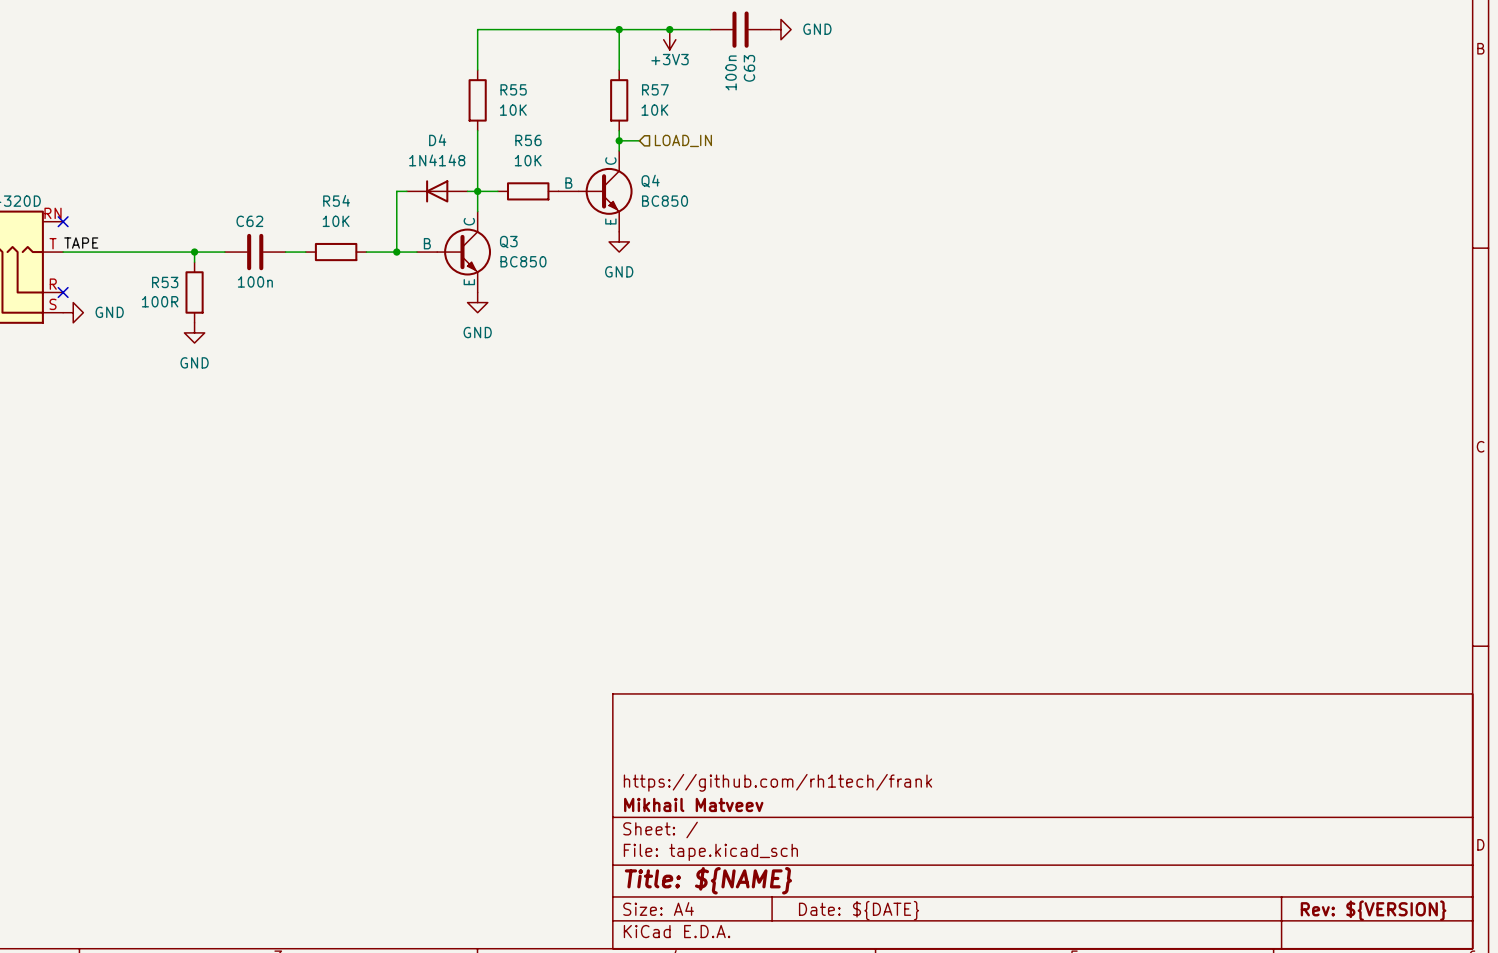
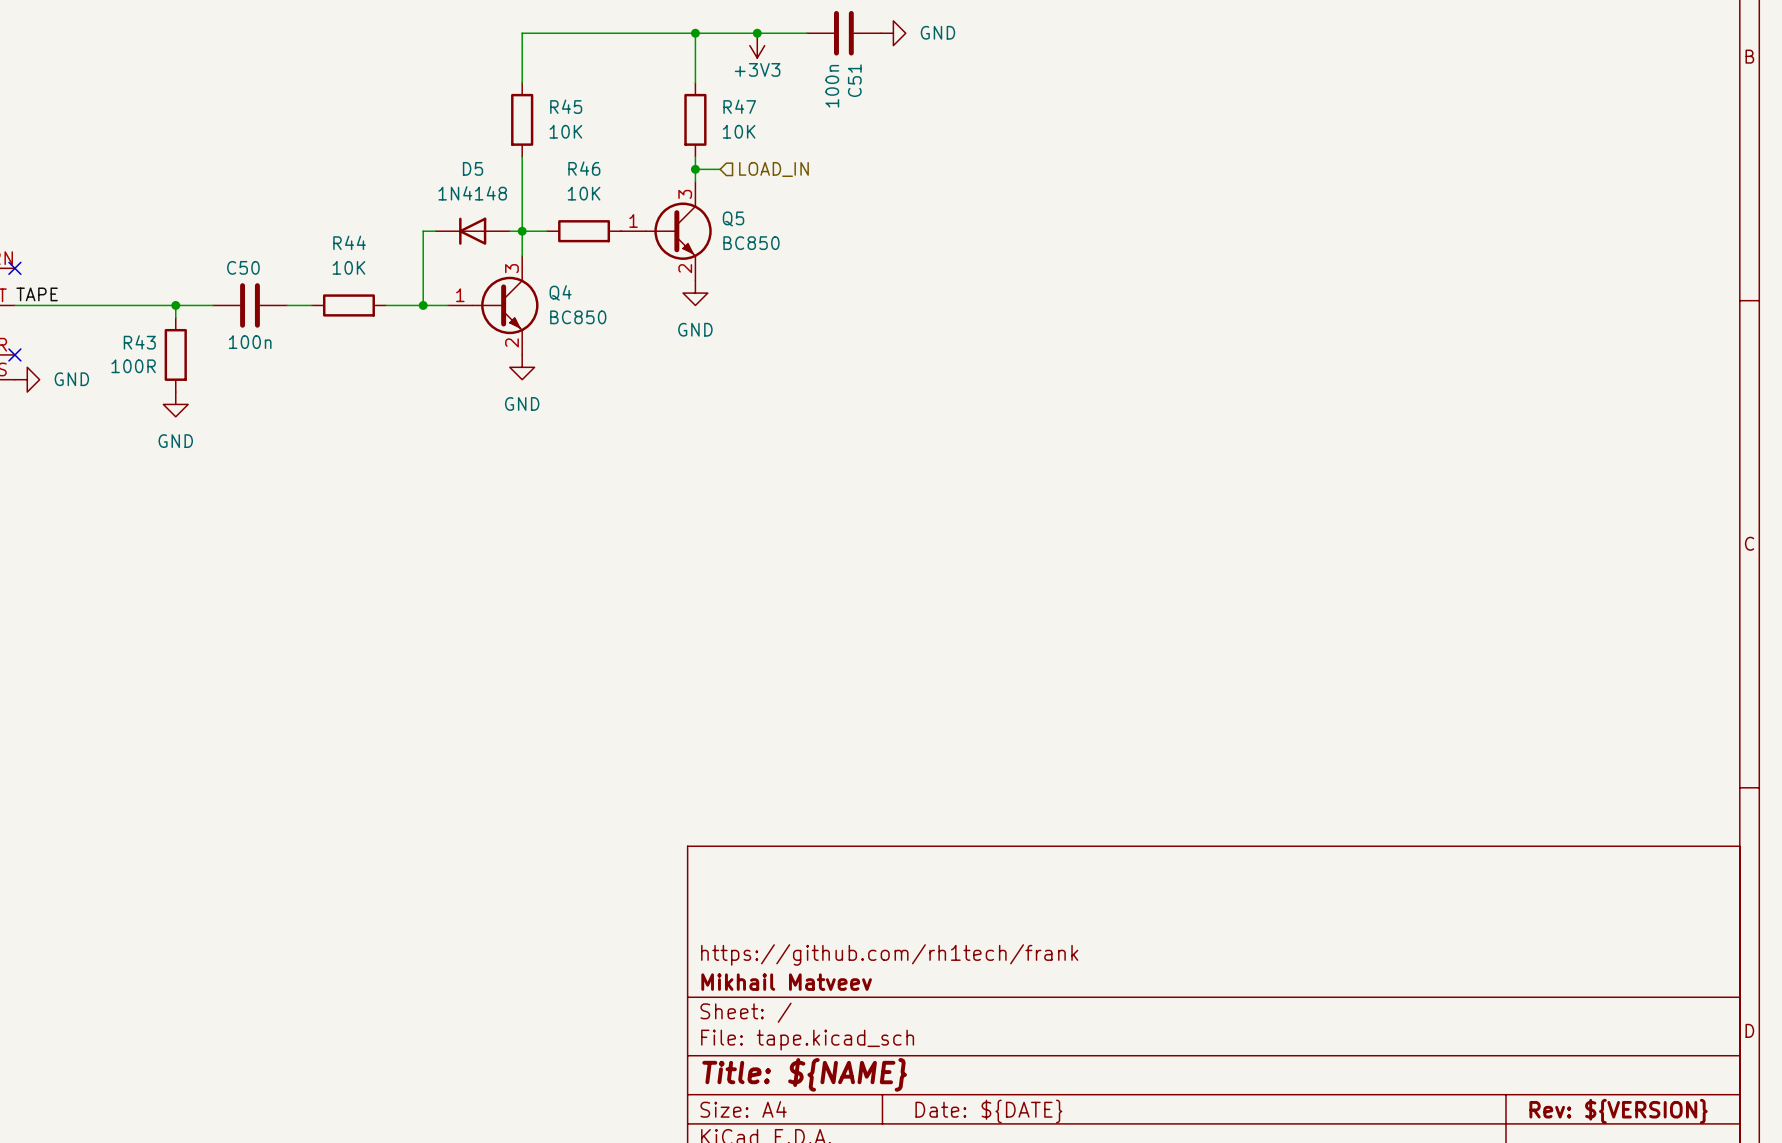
C63 name: C63 (749, 68) -> C51 (854, 80)
R55 name: R55 (513, 89) -> R45 (566, 106)
R57 name: R57 (655, 89) -> R47 (739, 106)
D4 name: D4 (437, 140) -> D5 (473, 168)
R56 name: R56 (528, 140) -> R46 (584, 168)
Q4 pin name: C (610, 161) -> none
Q4 pin name: B (568, 183) -> none
Q4 position: (595, 191) -> (493, 305)
Q5: none -> BC850 (666, 231)
R54 name: R54 (336, 200) -> R44 (349, 242)
C62 name: C62 (249, 221) -> C50 (243, 267)
Q4 pin number: none -> 3 (511, 268)
Q4 pin name: E (610, 221) -> none
Q4 pin number: none -> 1 (460, 295)
Q3: BC850 (454, 252) -> none
R53 name: R53 (165, 282) -> R43 (139, 342)
Q4 pin number: none -> 2 (511, 342)

